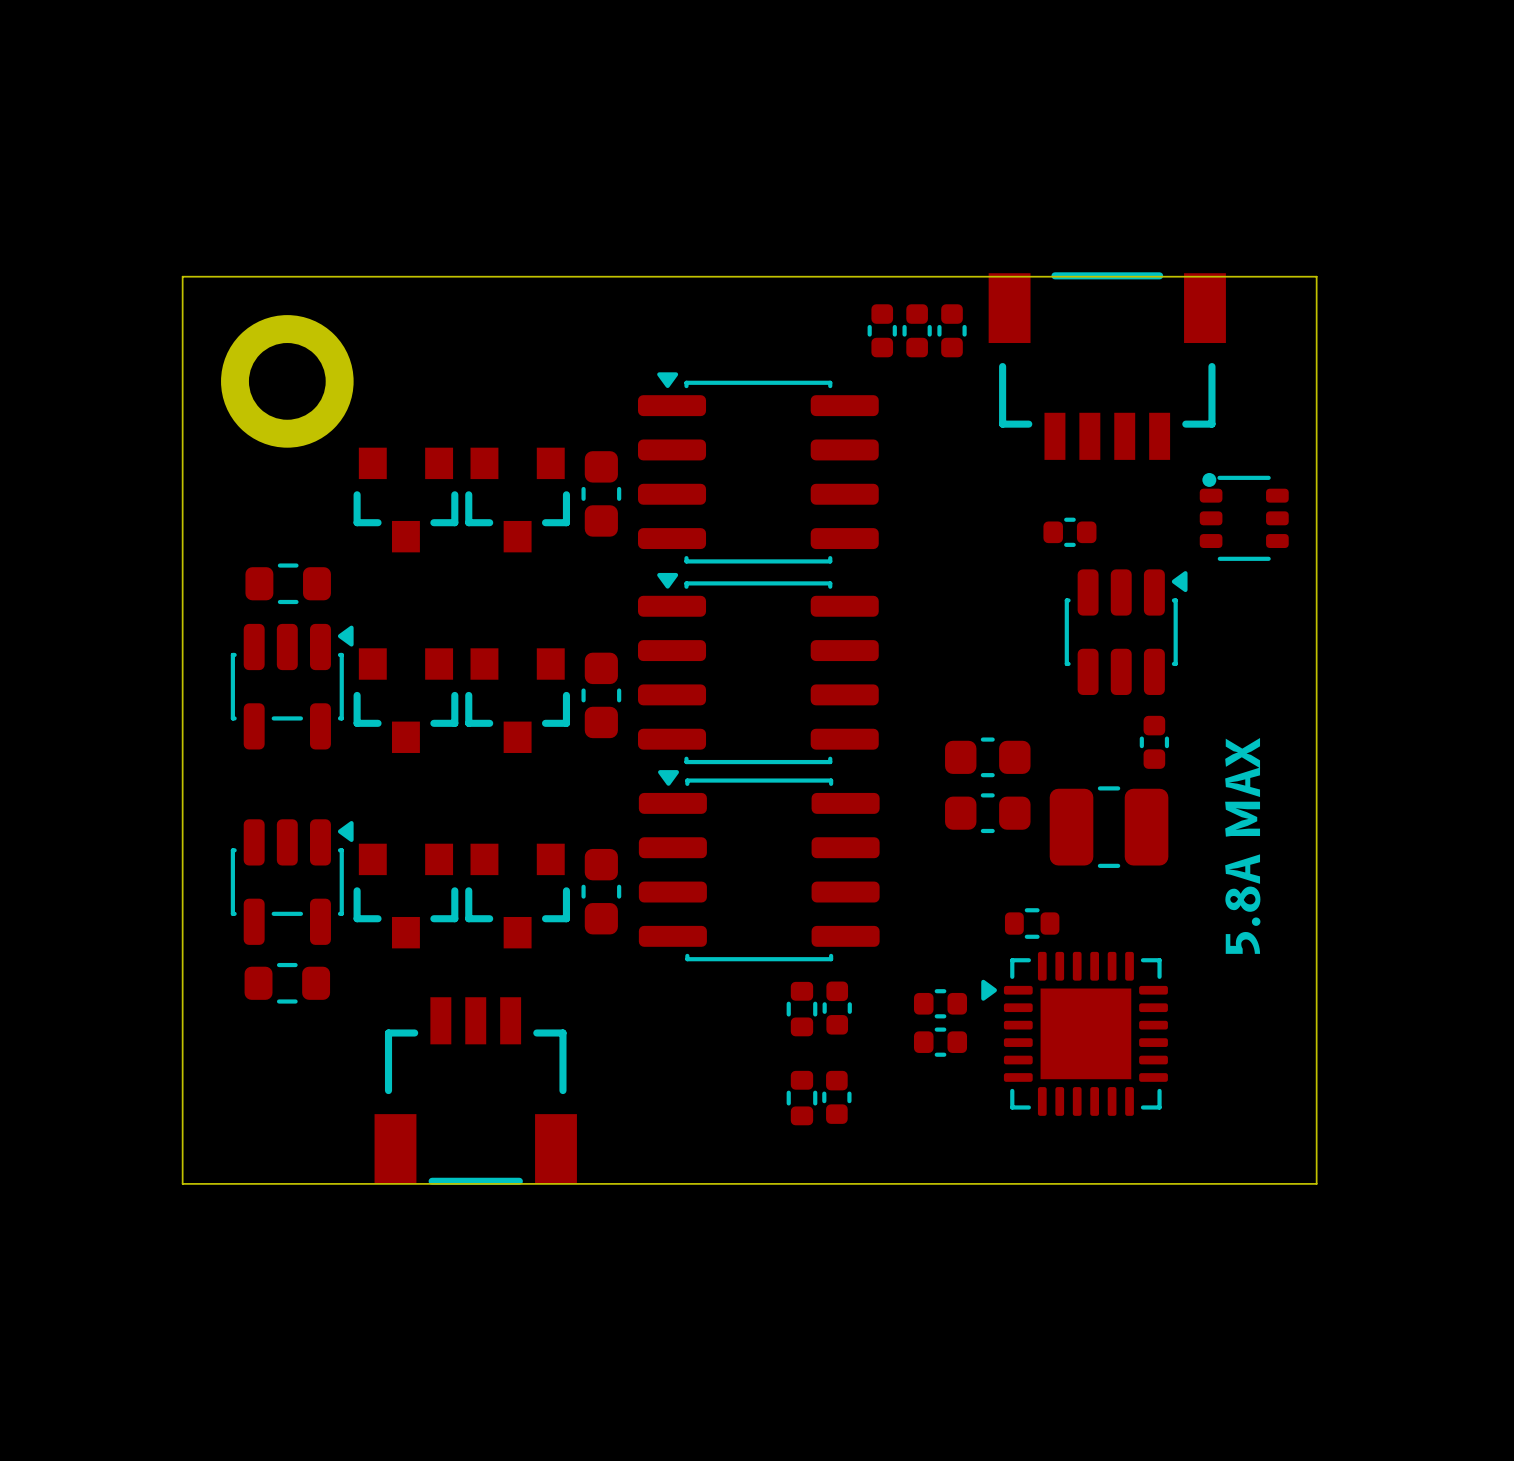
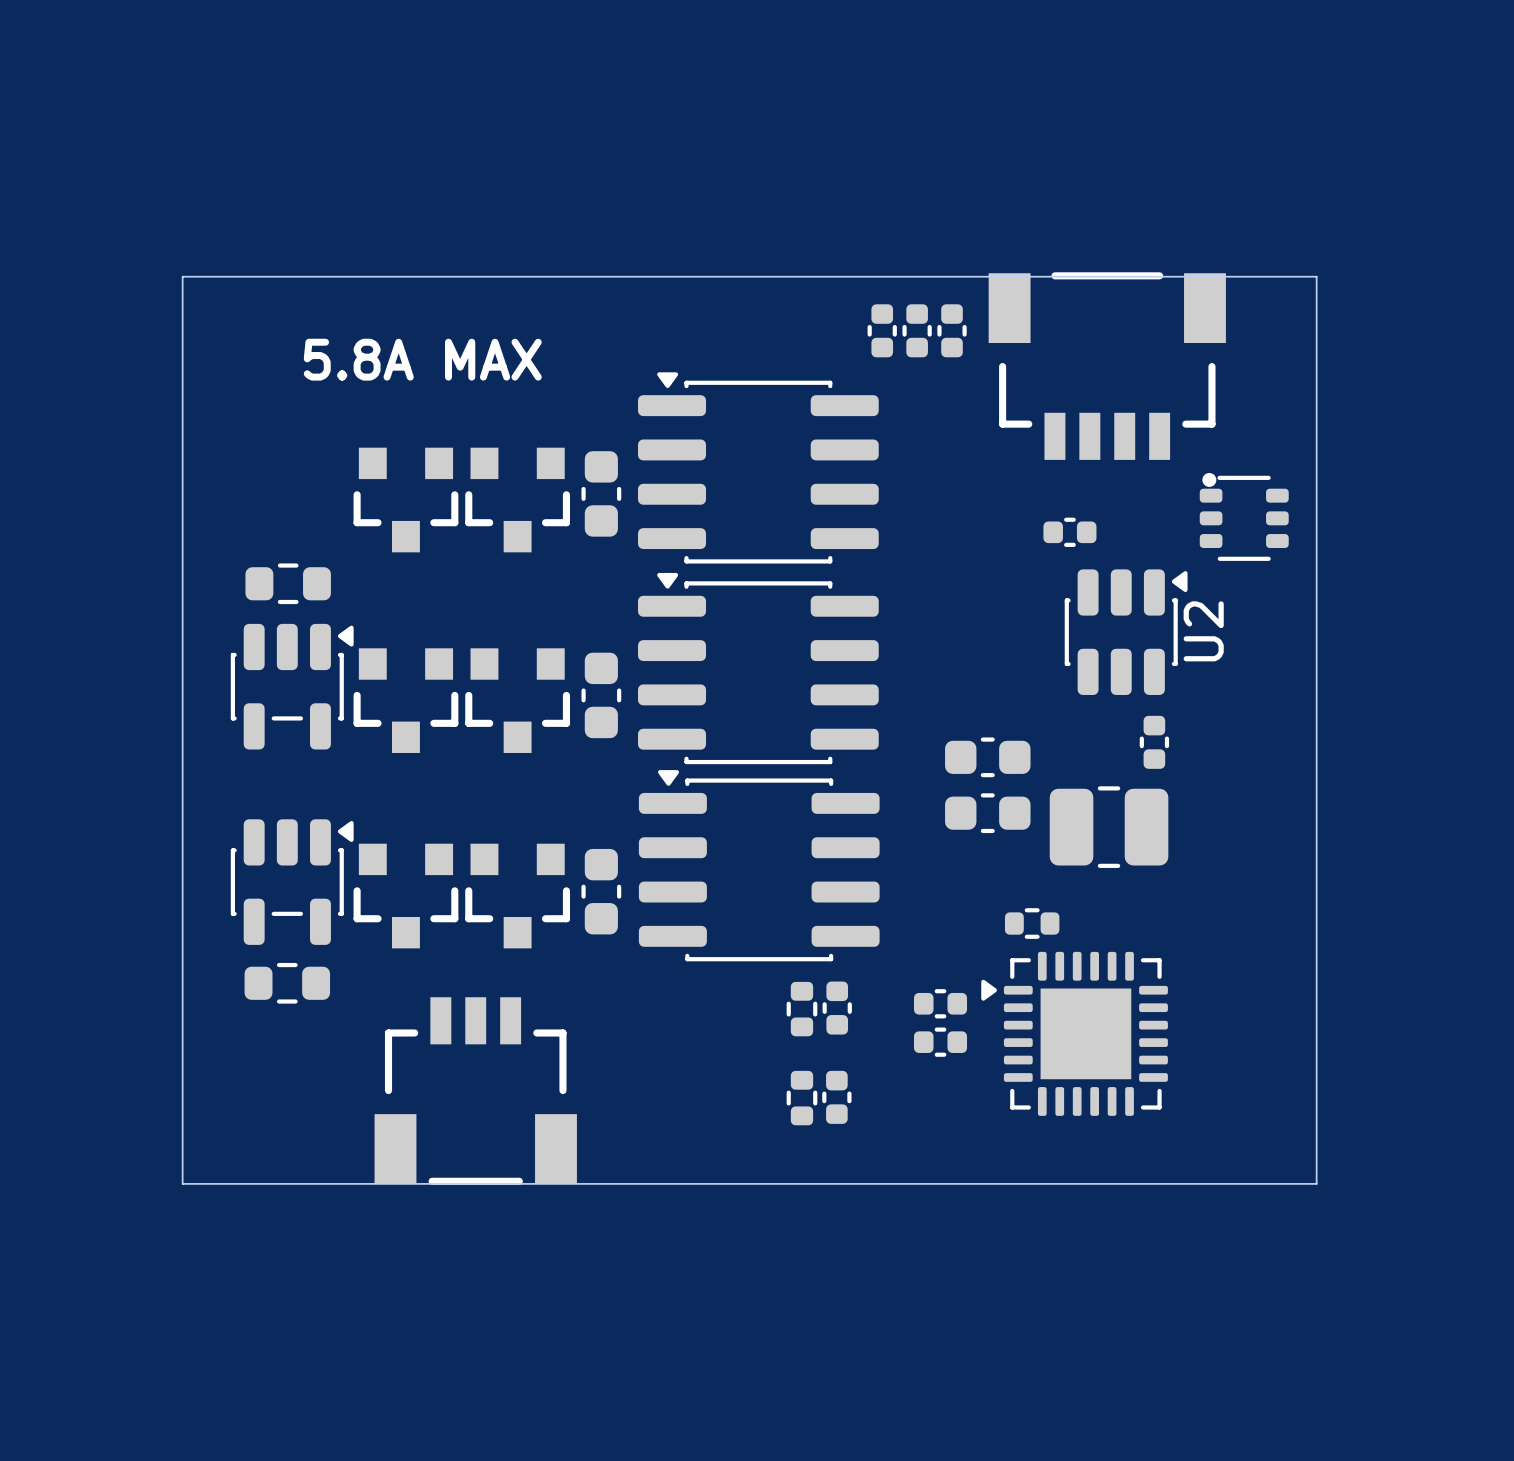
text: none -> 5.8A MAX (422, 359)
part: (287, 381) -> none
U2 name: none -> U2 (1203, 631)
text: 5.8A MAX (1242, 845) -> none

